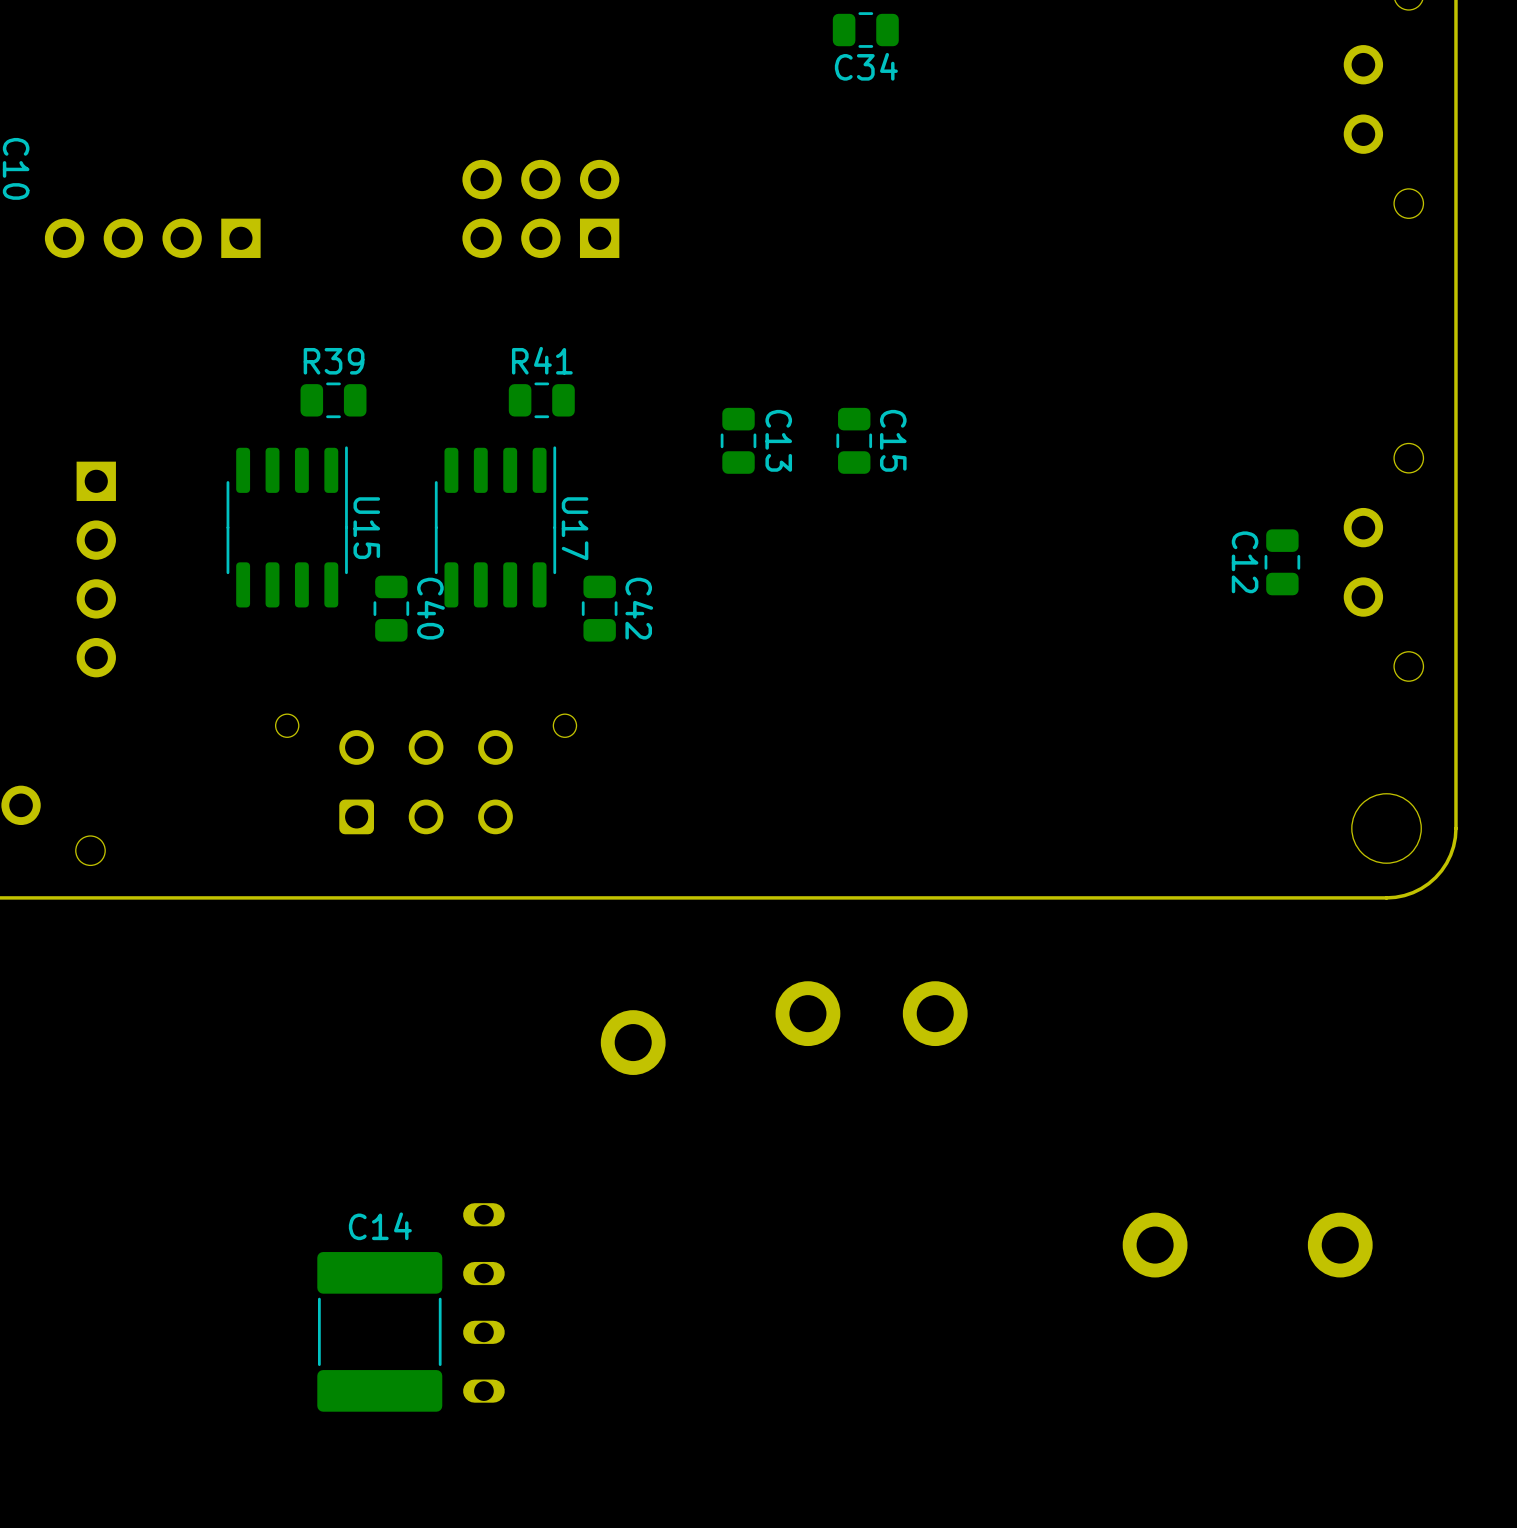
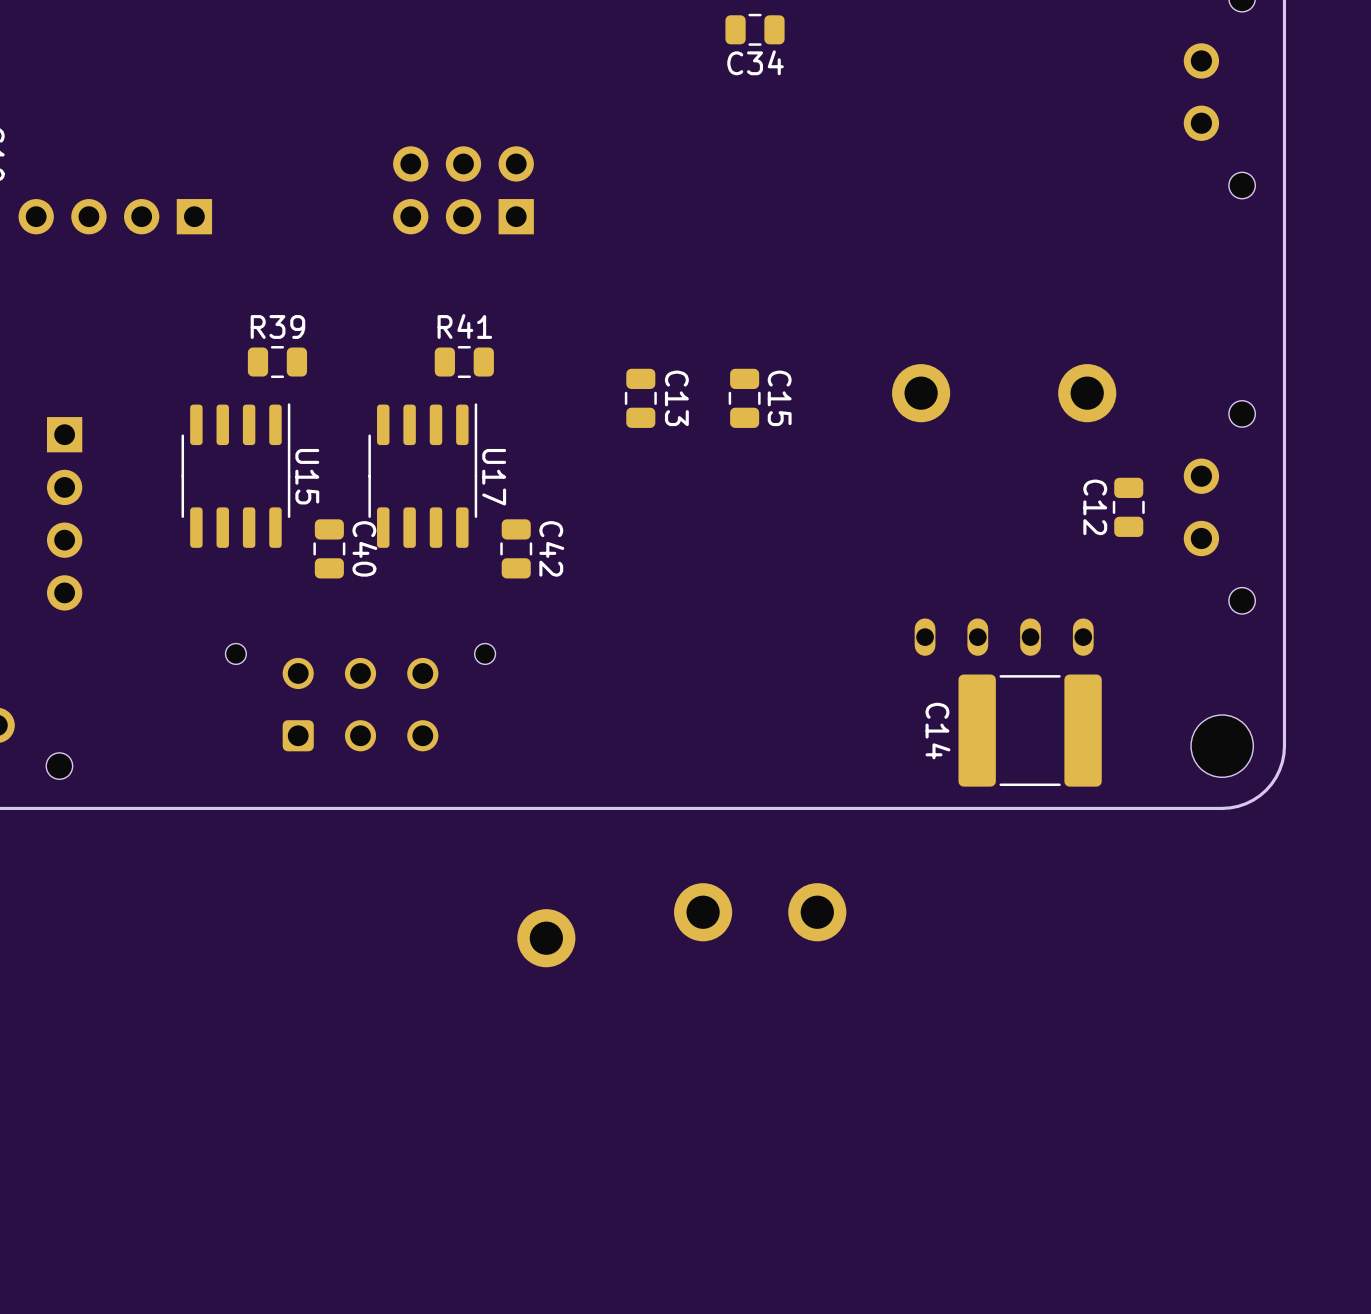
part: none -> (921, 393)
part: none -> (1087, 393)
part: none -> (1004, 637)
C14 name position: C14 (380, 1226) -> C14 (937, 731)
part: (1155, 1245) -> none
part: (1340, 1245) -> none
part: (483, 1302) -> none
C14 rotation: 0° (379, 1331) -> 90° clockwise (1030, 730)
C14 position: (379, 1331) -> (1030, 730)

